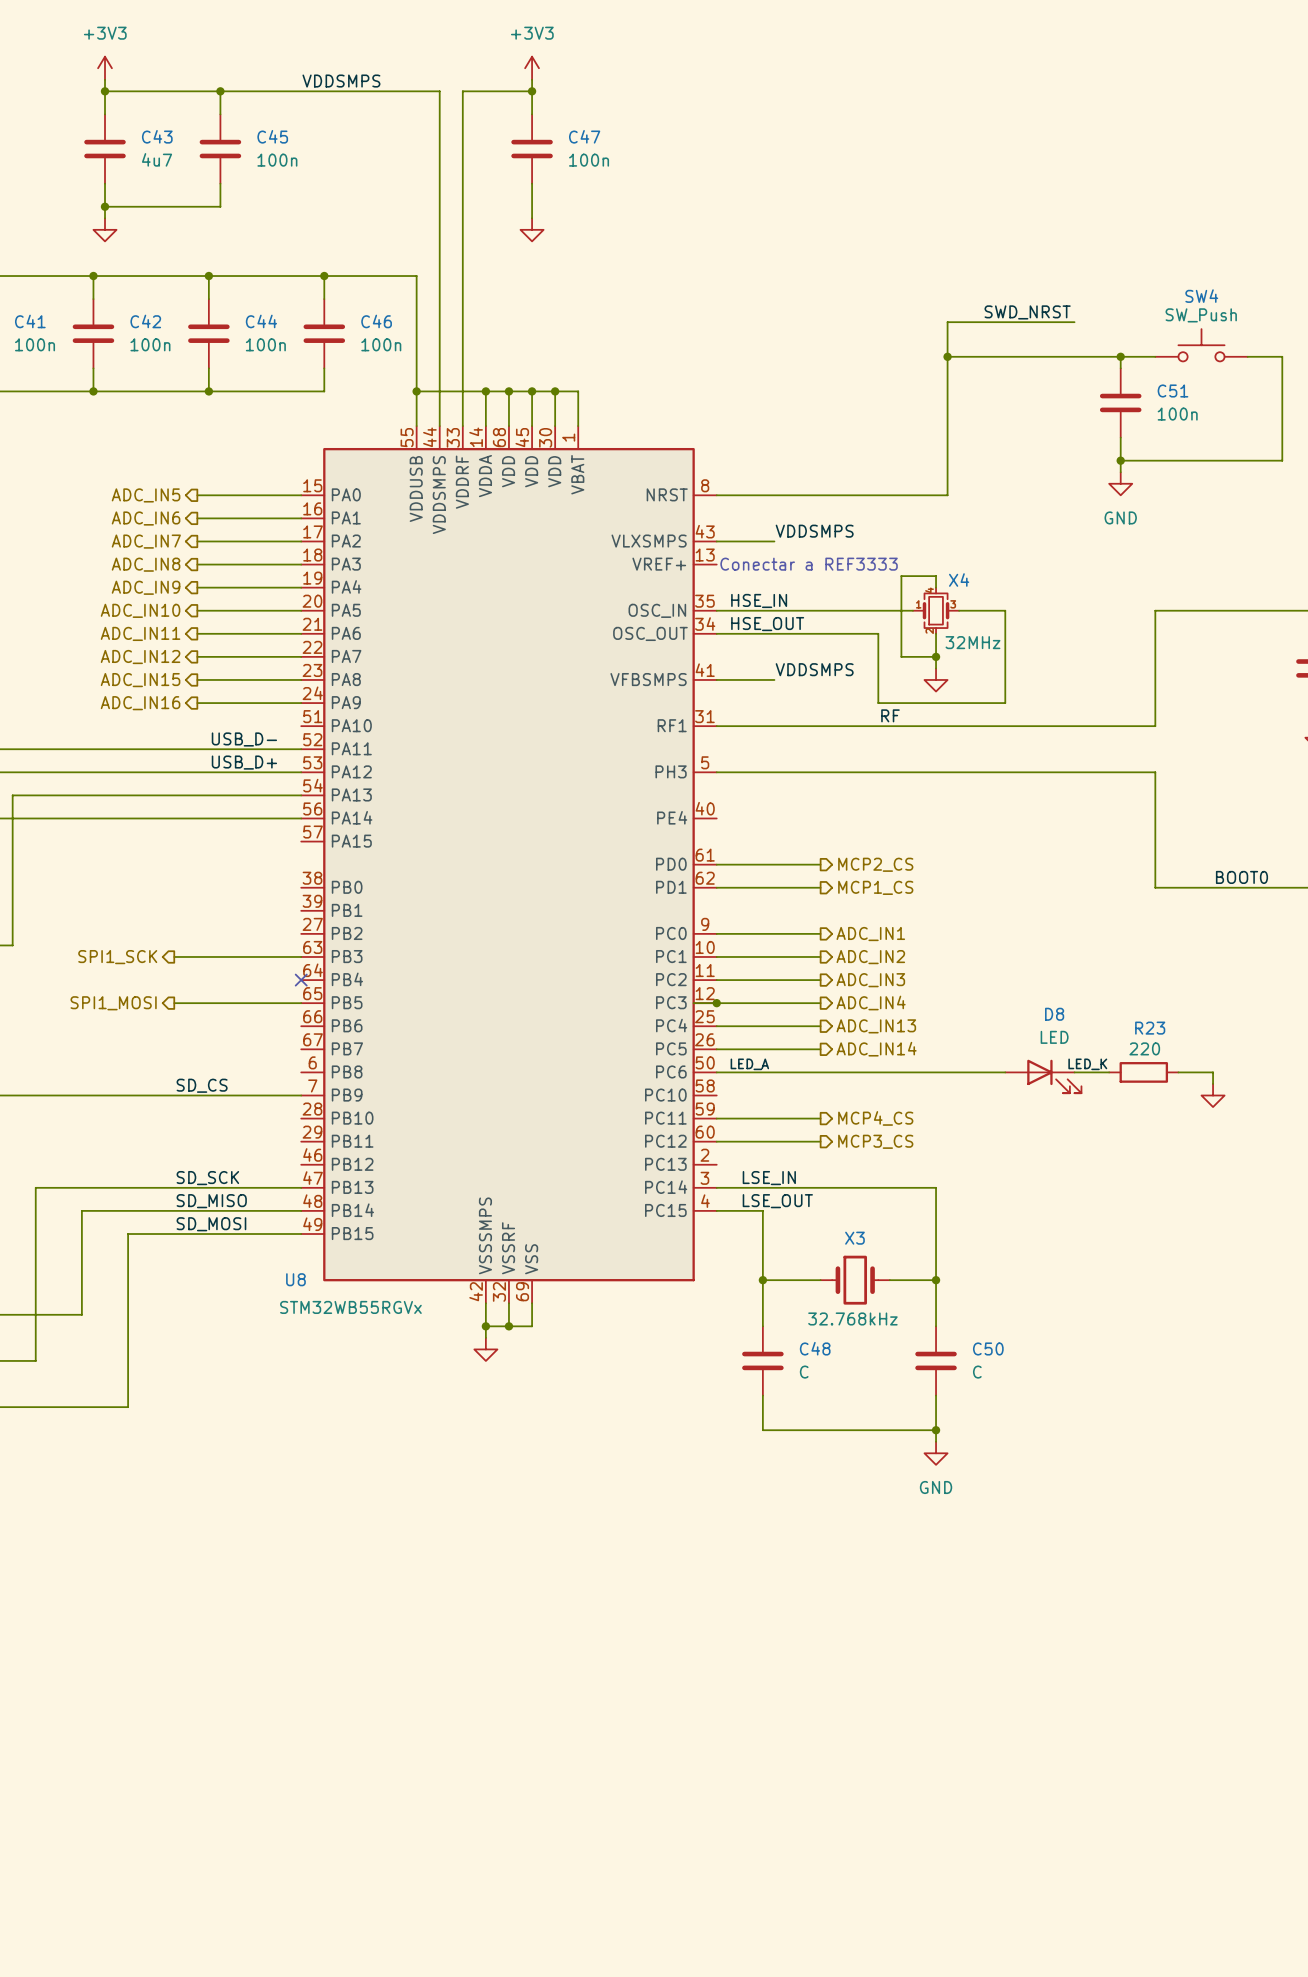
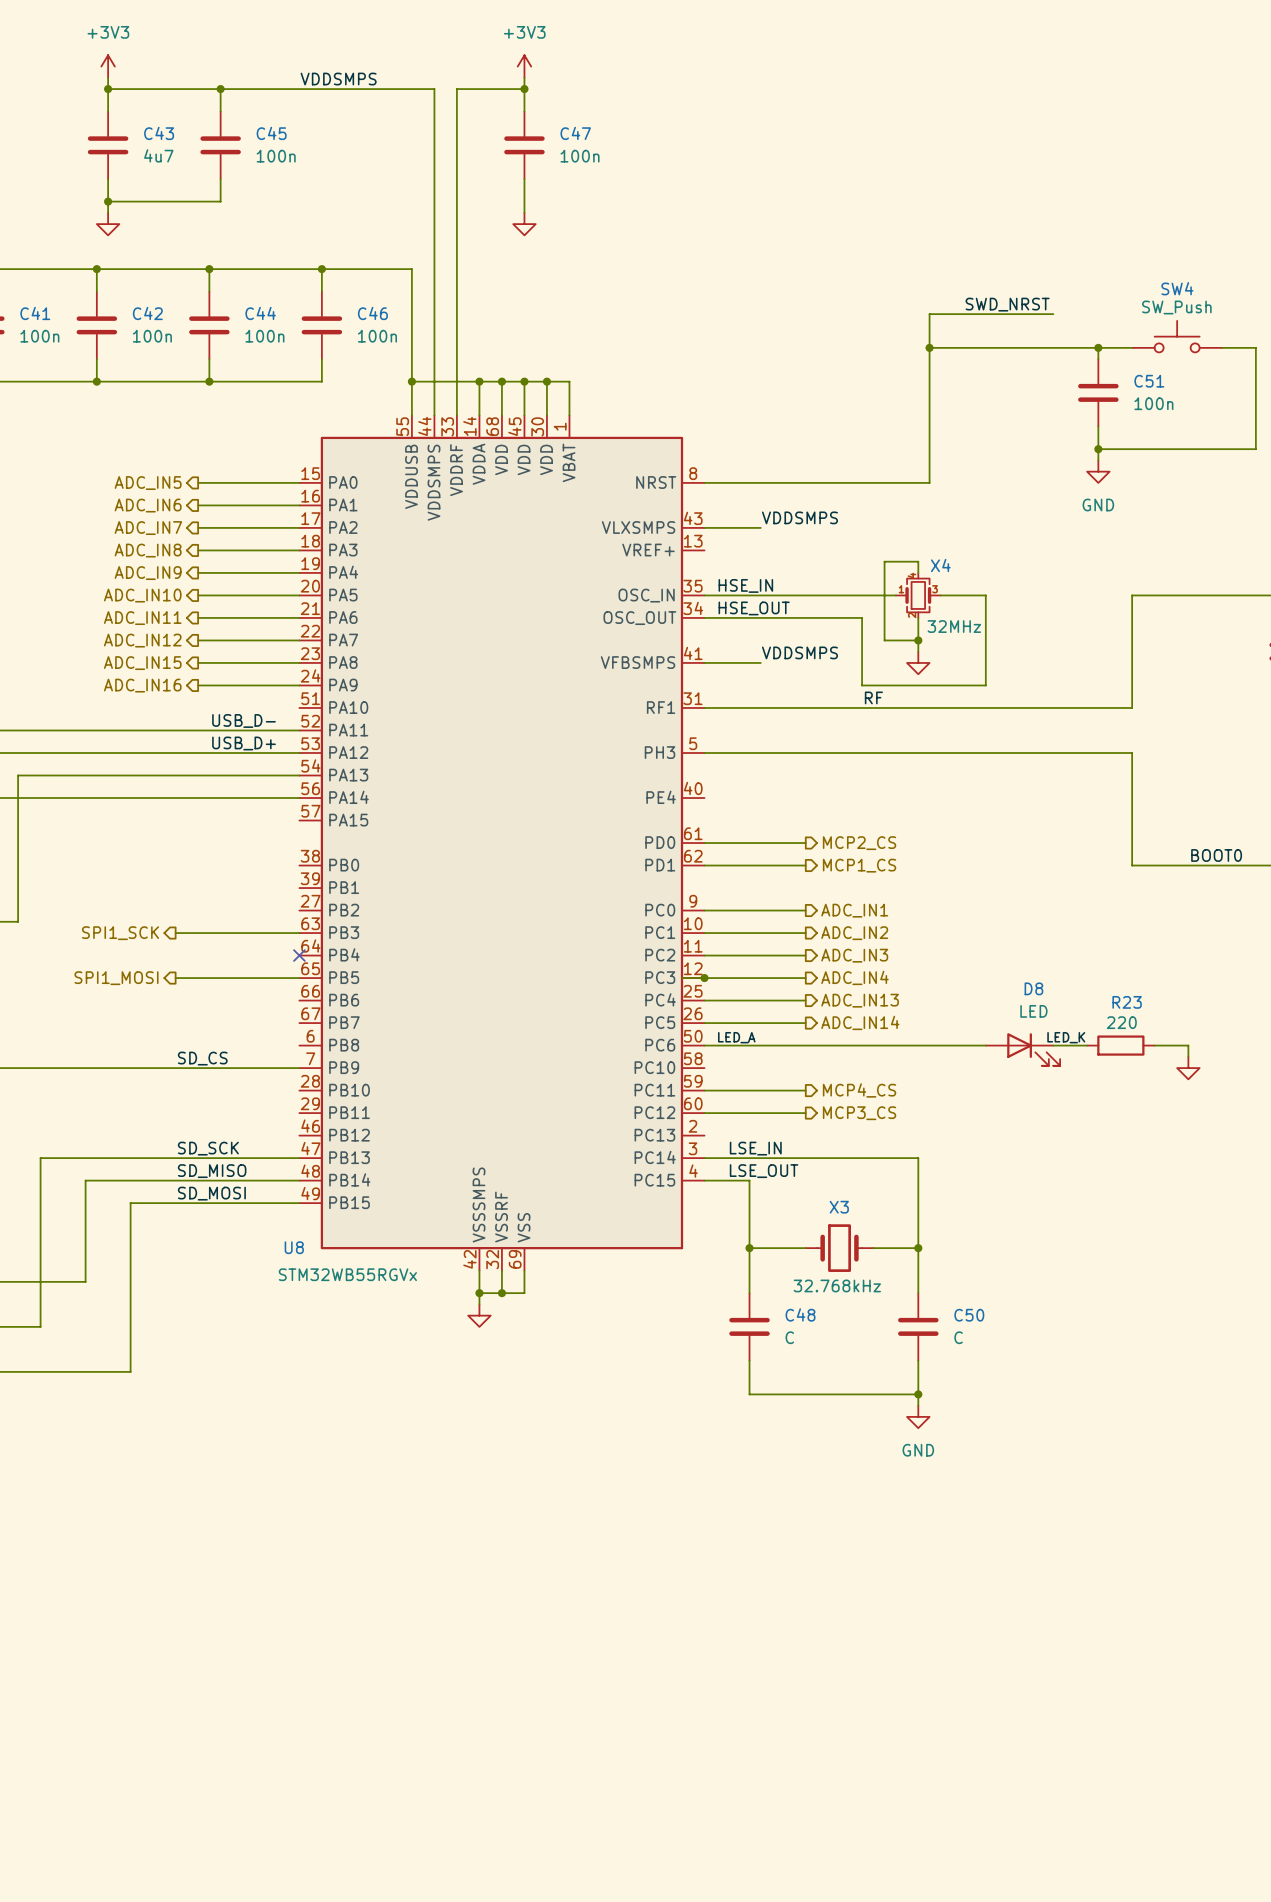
text: Conectar a REF3333 (809, 564) -> none

